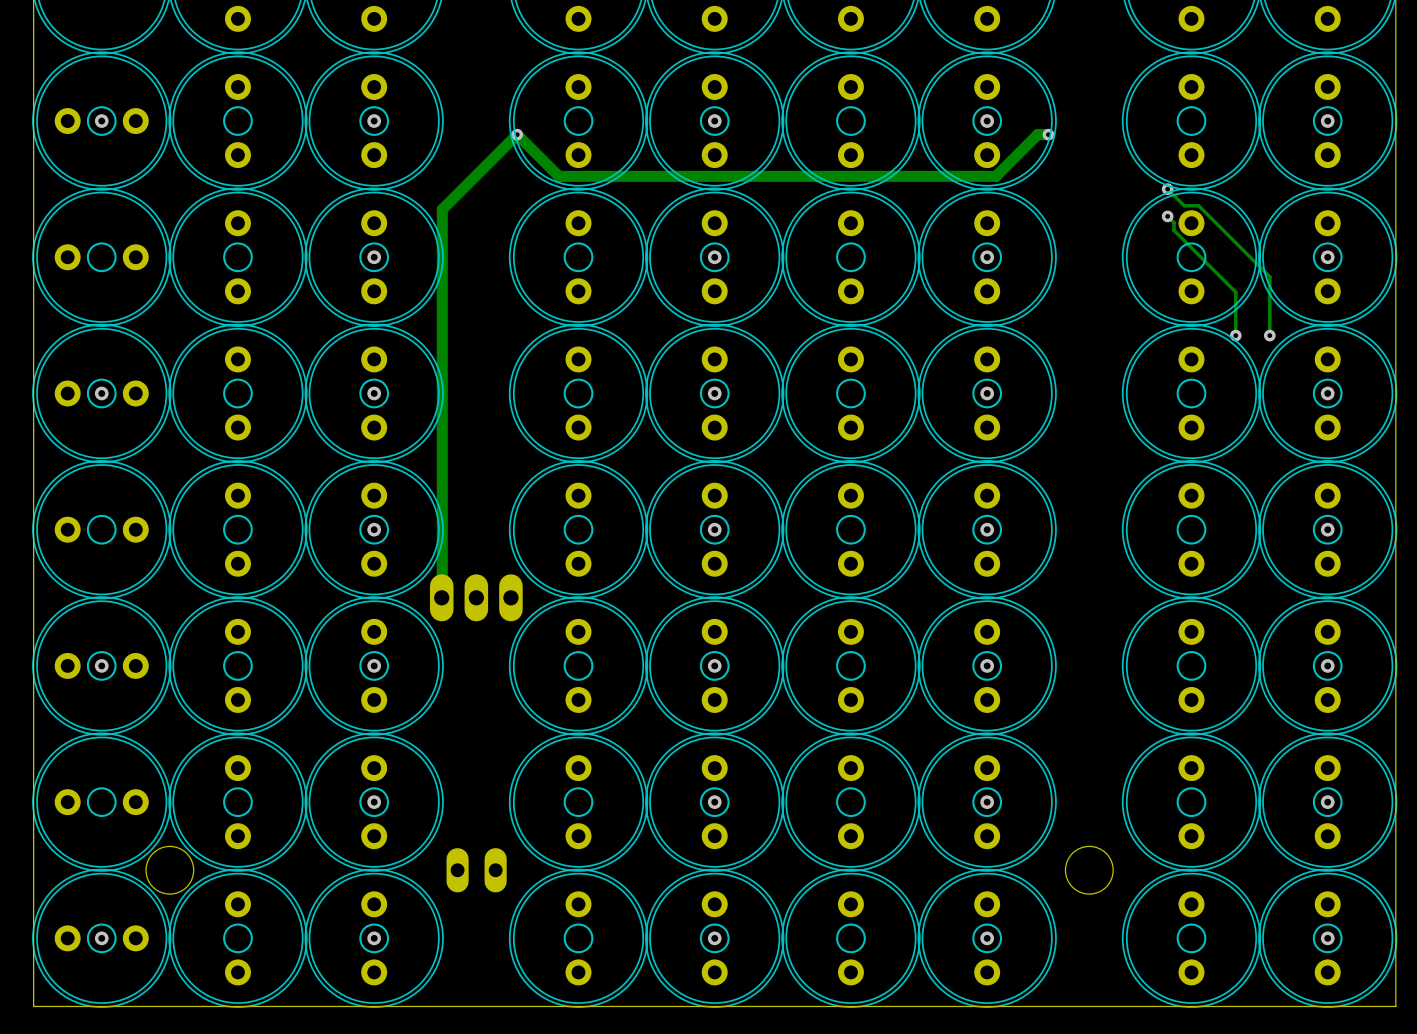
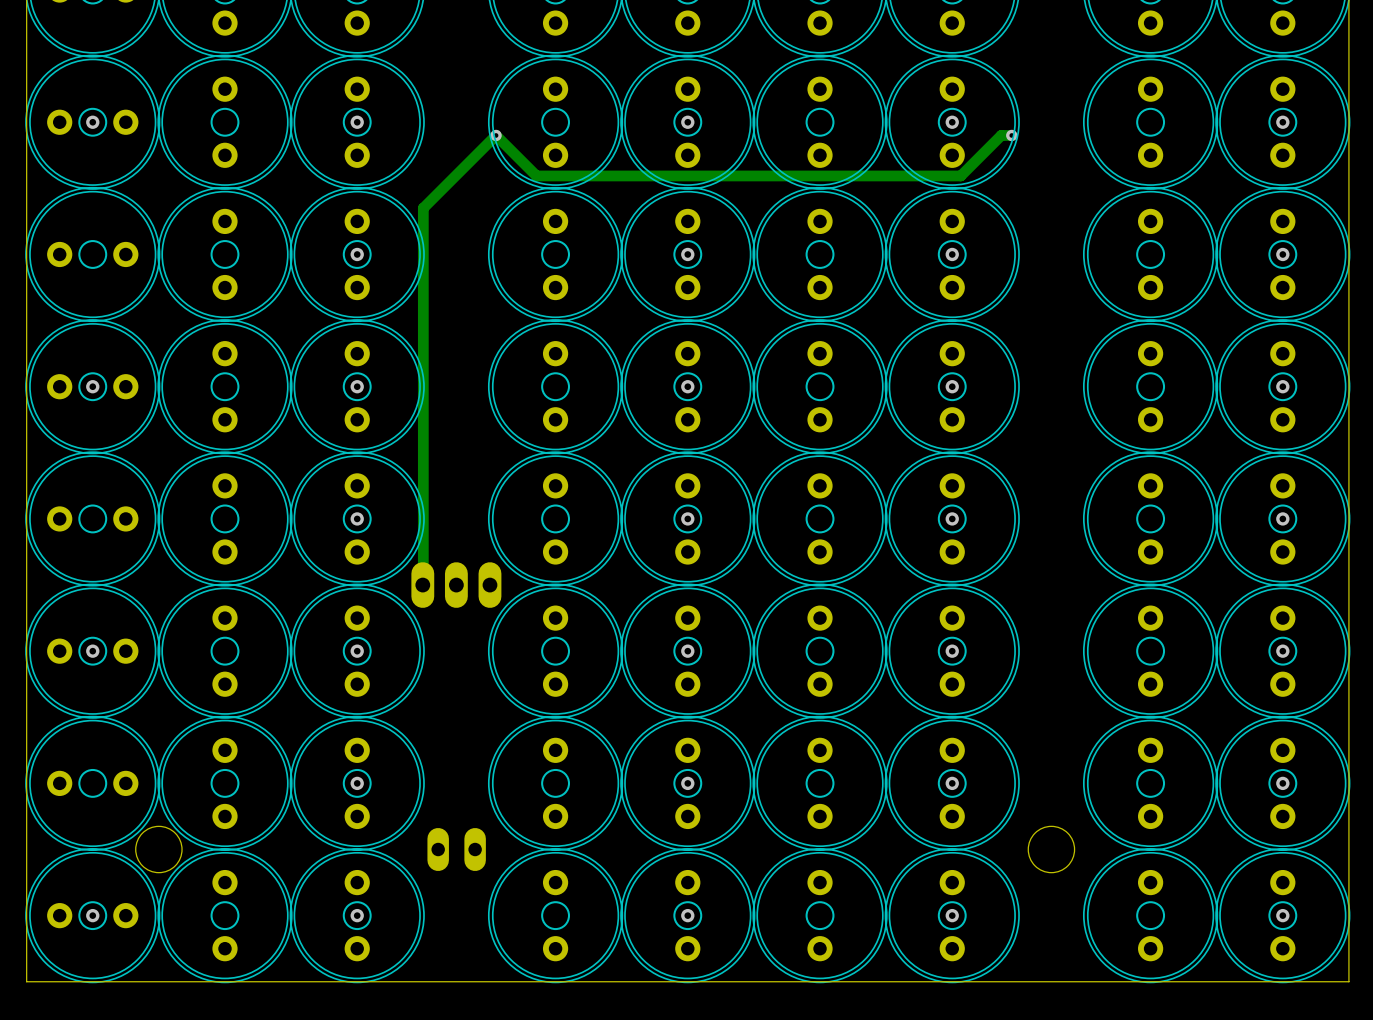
track: (1167, 189) (1184, 205) (1198, 205) (1269, 276) (1269, 335) -> none
via: (1167, 189) -> none
track: (1167, 216) (1174, 222) (1174, 230) (1235, 292) (1235, 335) -> none
via: (1167, 216) -> none
via: (1235, 335) -> none
via: (1269, 335) -> none

